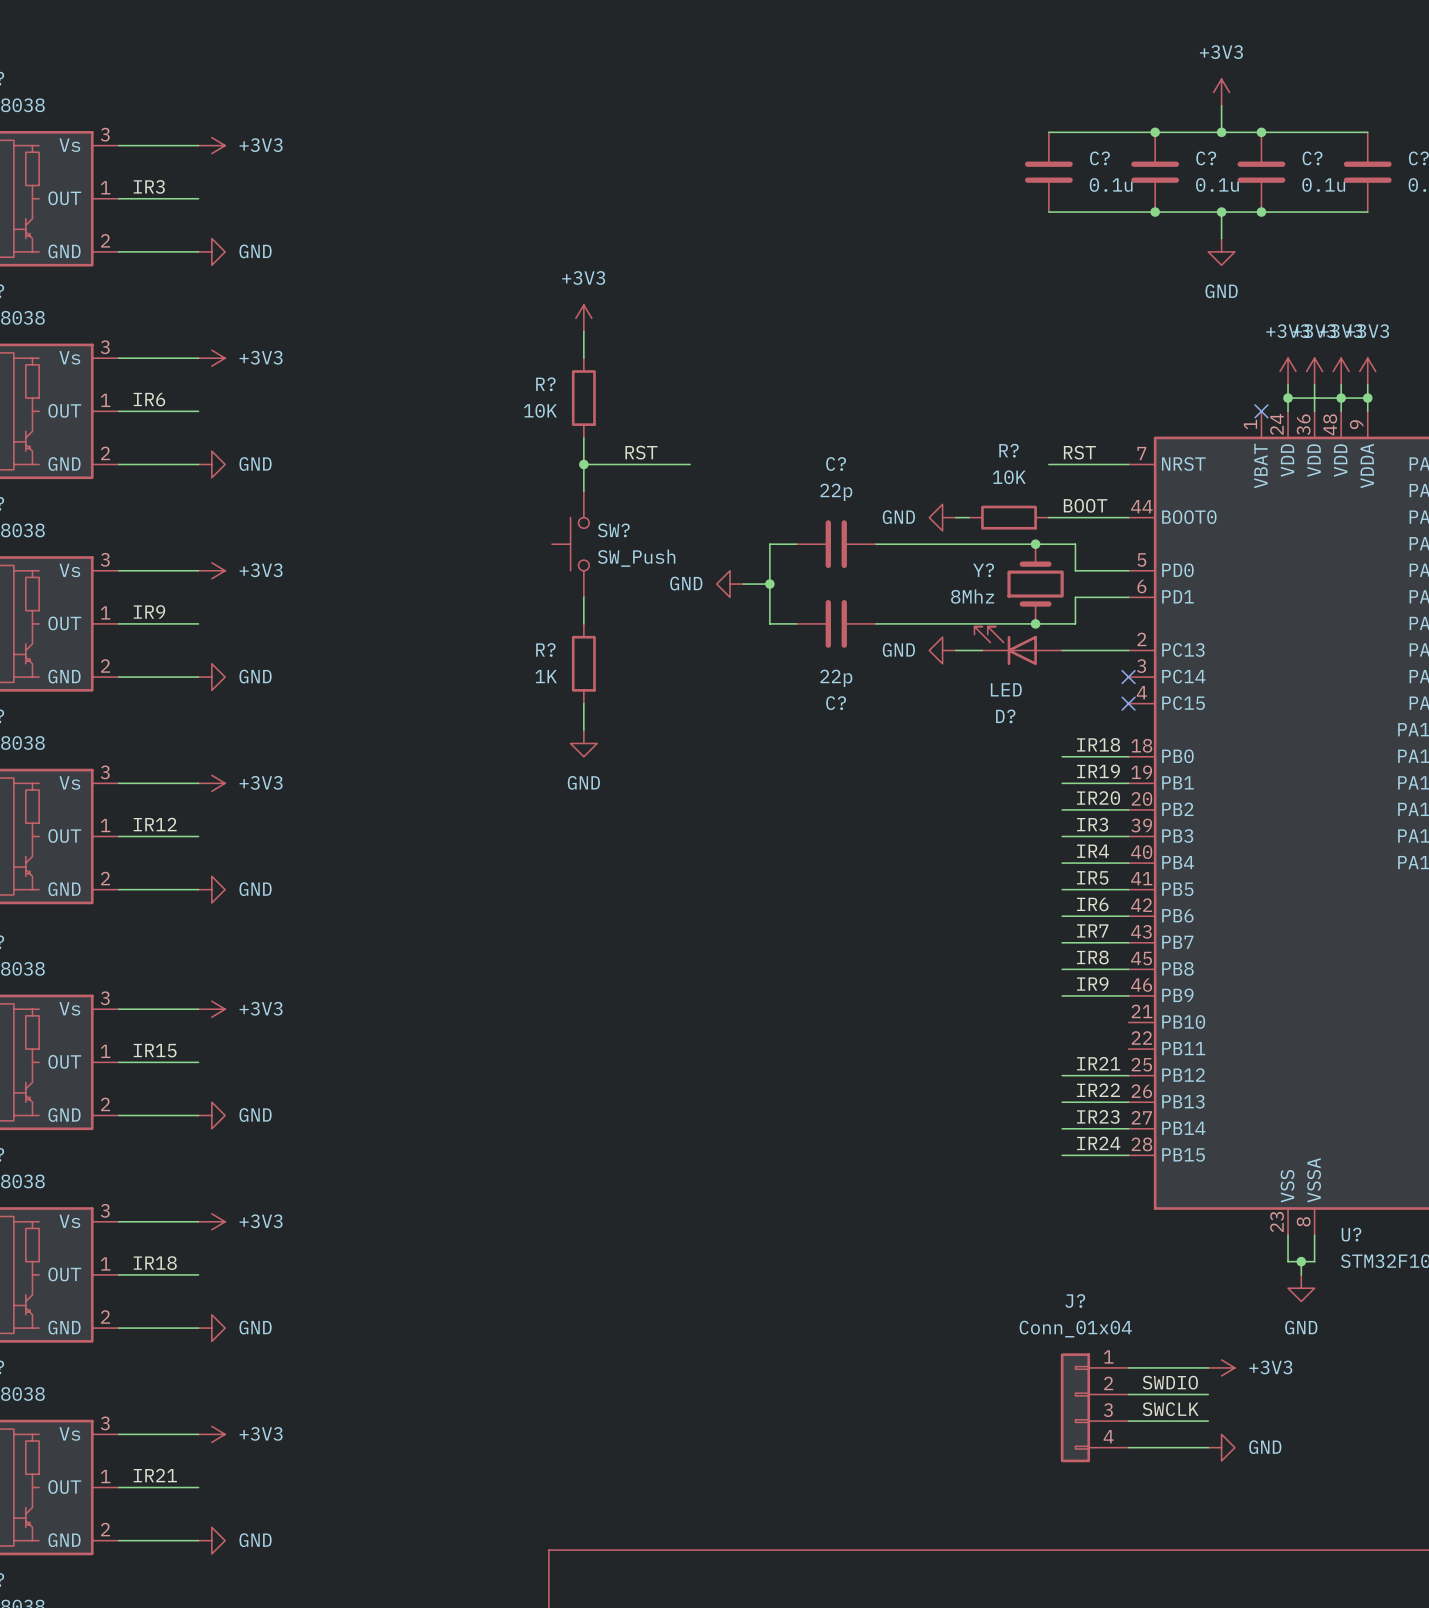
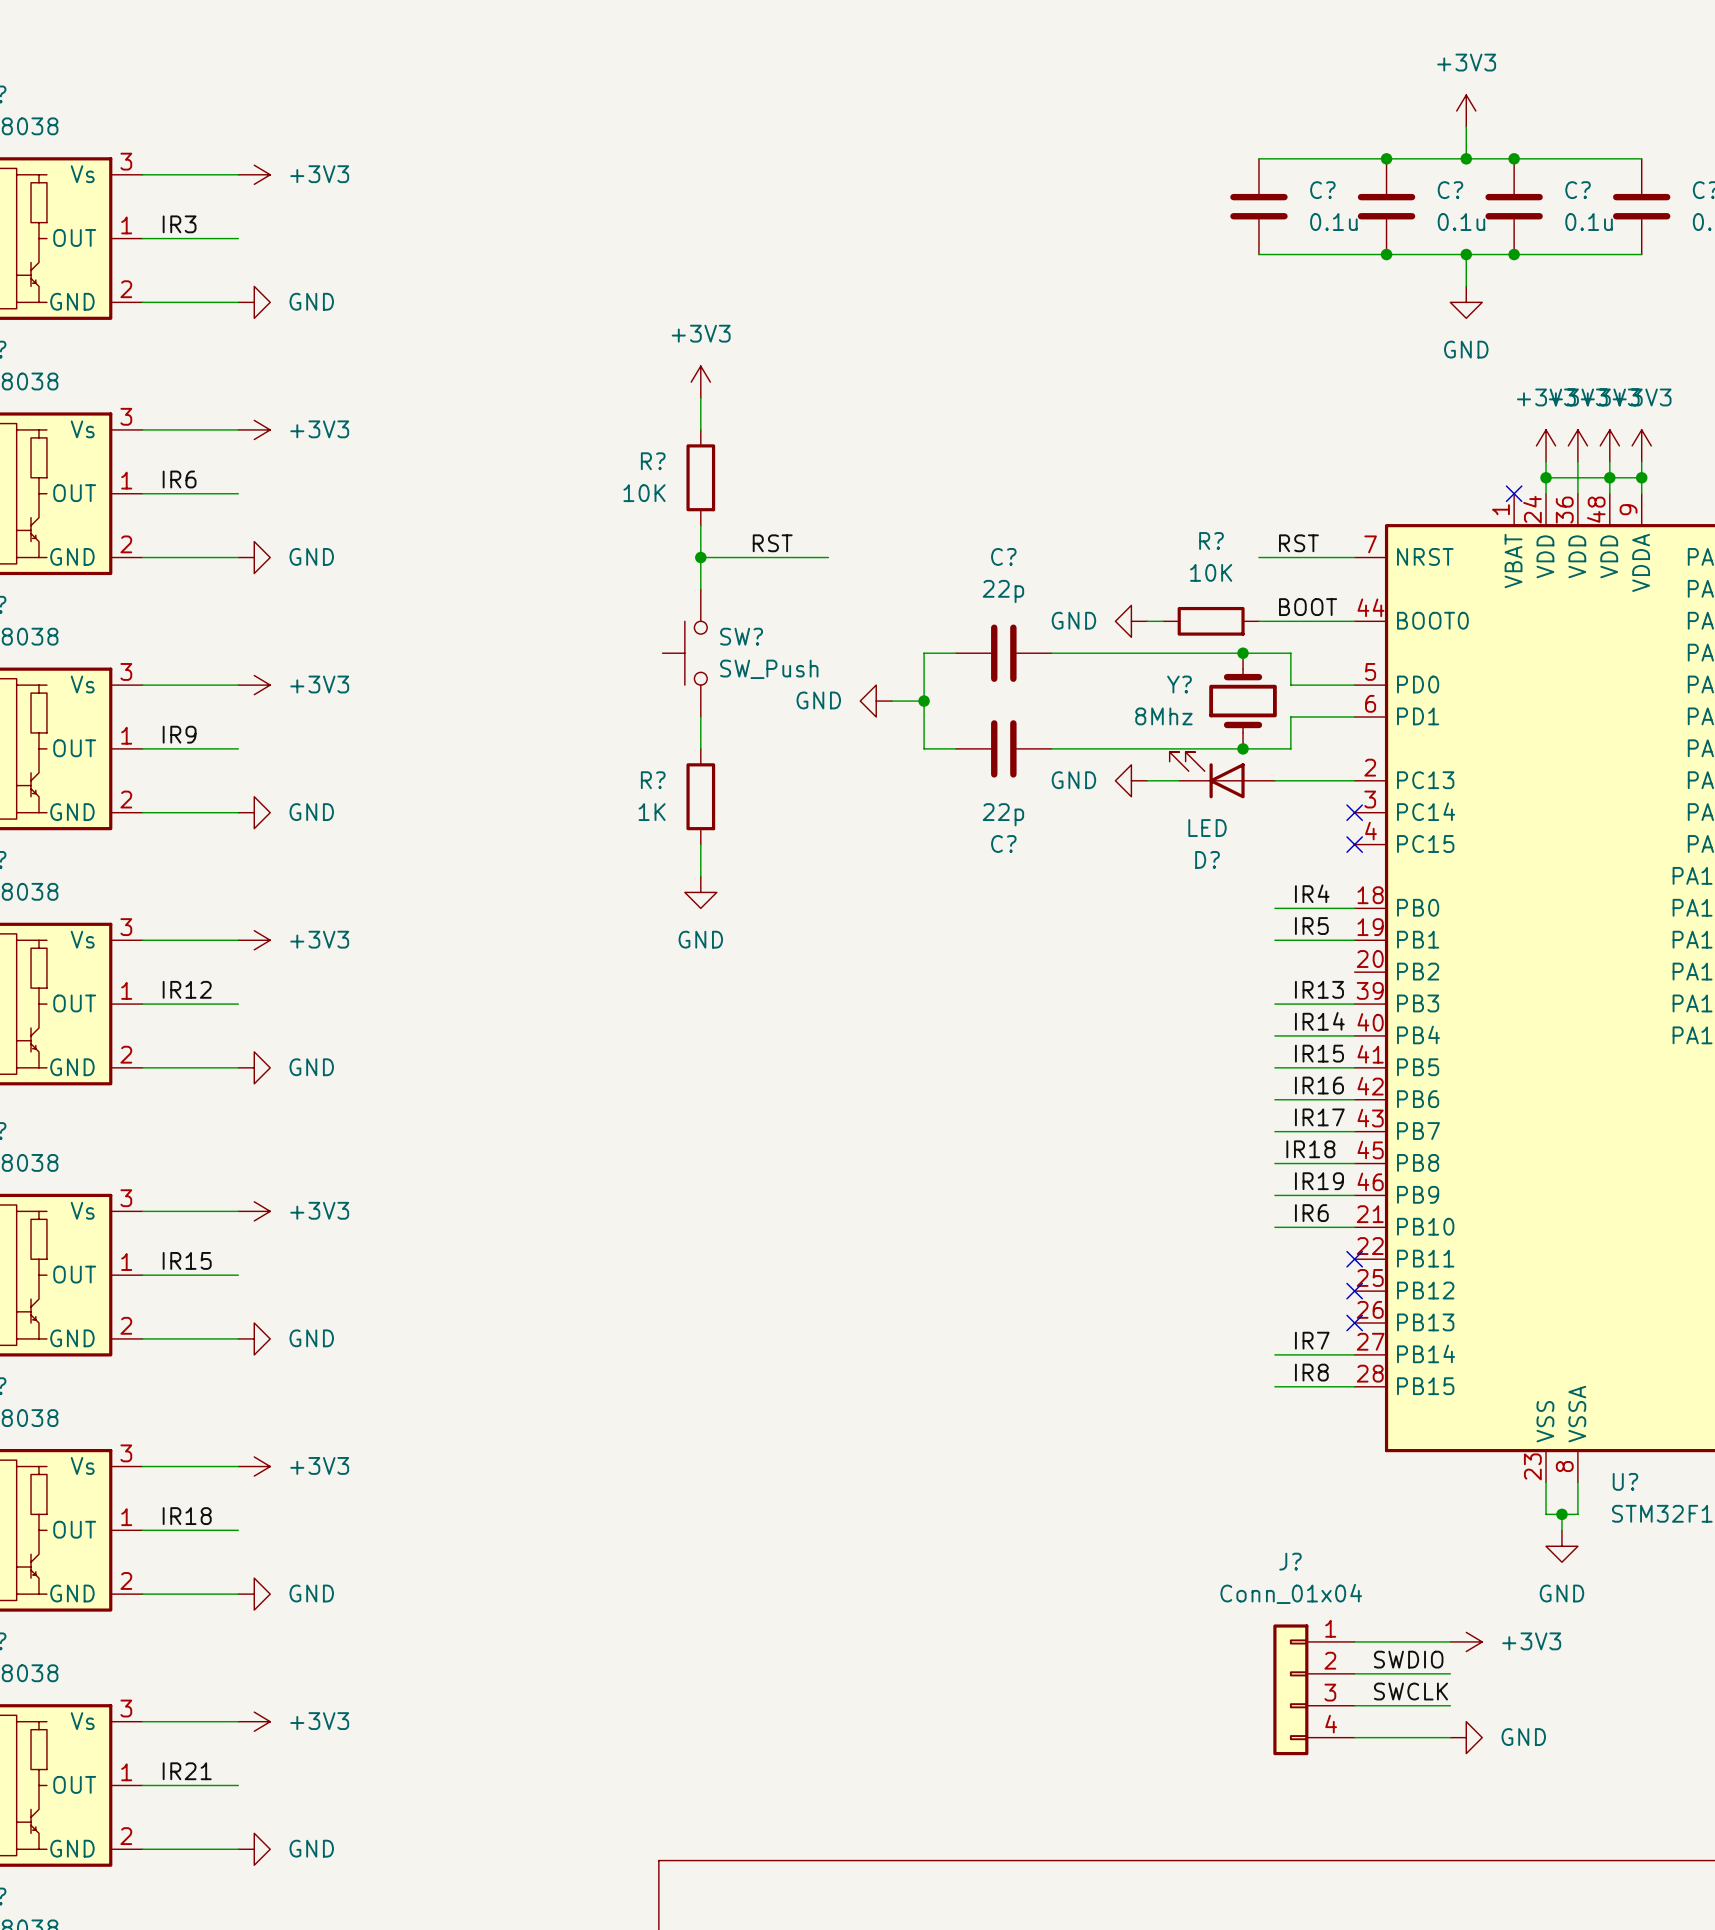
label: IR18 (1098, 744) -> IR4 (1312, 893)
label: IR19 (1098, 771) -> IR5 (1311, 926)
label: IR20 (1098, 798) -> none
wire: (1062, 809) (1128, 809) -> none
label: IR3 (1092, 824) -> IR13 (1319, 989)
label: IR4 (1093, 851) -> IR14 (1319, 1021)
label: IR5 (1092, 877) -> IR15 (1319, 1053)
label: IR6 (1092, 904) -> IR16 (1319, 1085)
label: IR7 (1092, 930) -> IR17 (1319, 1117)
label: IR8 (1092, 957) -> IR18 (1310, 1149)
label: IR9 (1092, 983) -> IR19 (1319, 1181)
label: none -> IR6 (1311, 1213)
no-connect mark: none -> (1354, 1259)
label: IR21 (1098, 1063) -> none
wire: (1062, 1075) (1128, 1075) -> (1274, 1227) (1354, 1227)
no-connect mark: none -> (1354, 1291)
label: IR22 (1098, 1090) -> none
wire: (1062, 1102) (1128, 1102) -> none
no-connect mark: none -> (1354, 1323)
label: IR23 (1098, 1116) -> IR7 (1312, 1340)
label: IR24 (1098, 1143) -> IR8 (1311, 1372)

